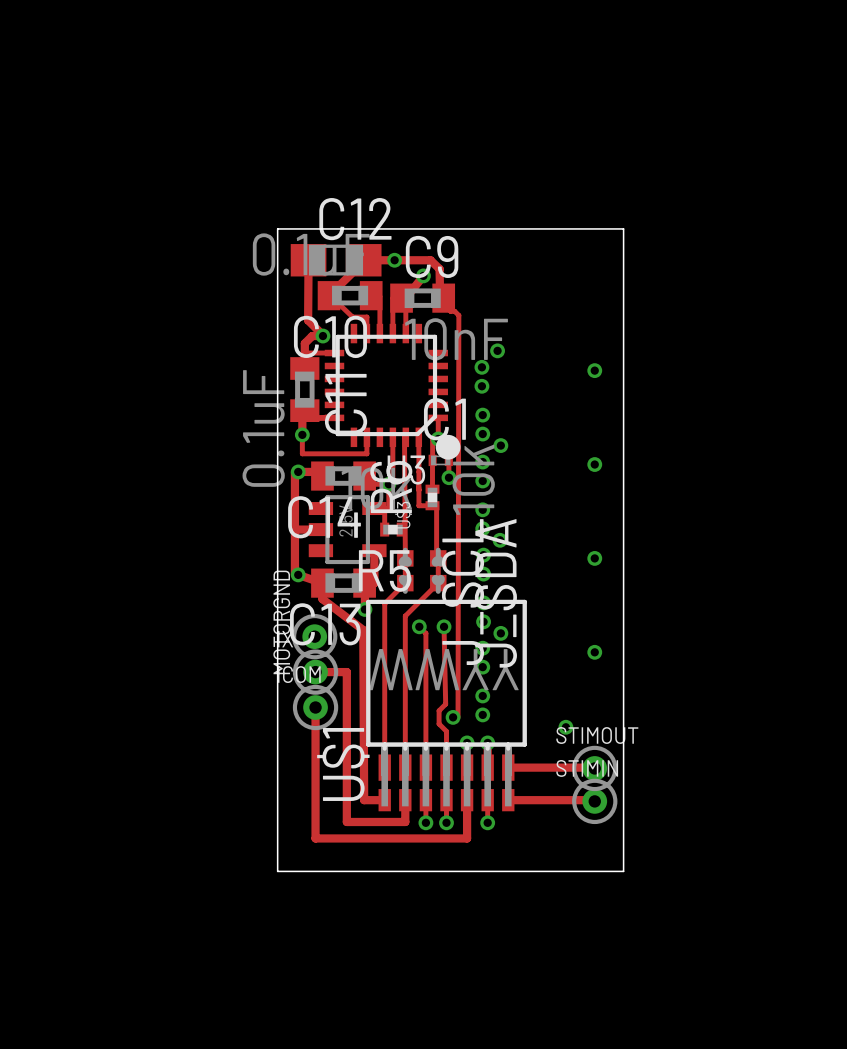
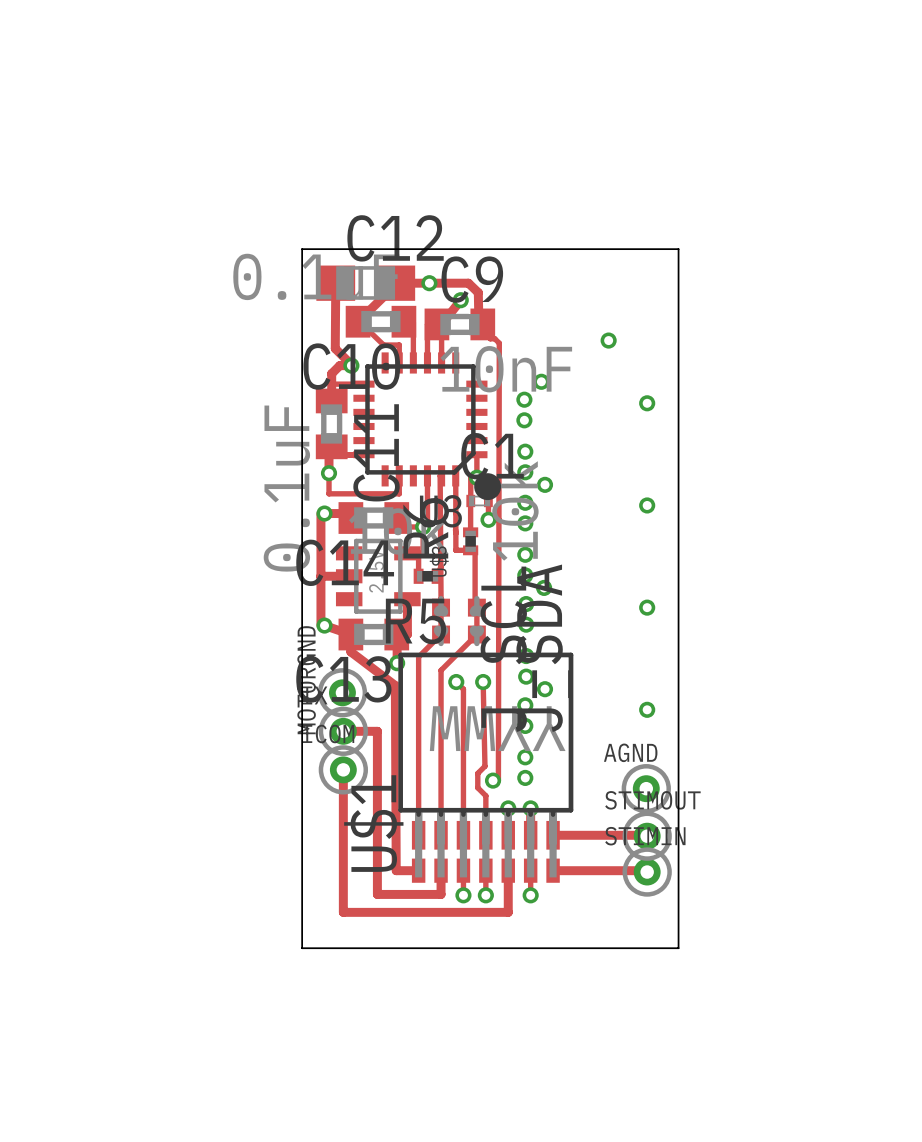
via: none -> (608, 340)
AGND: none -> (646, 788)
via: (565, 727) -> none

